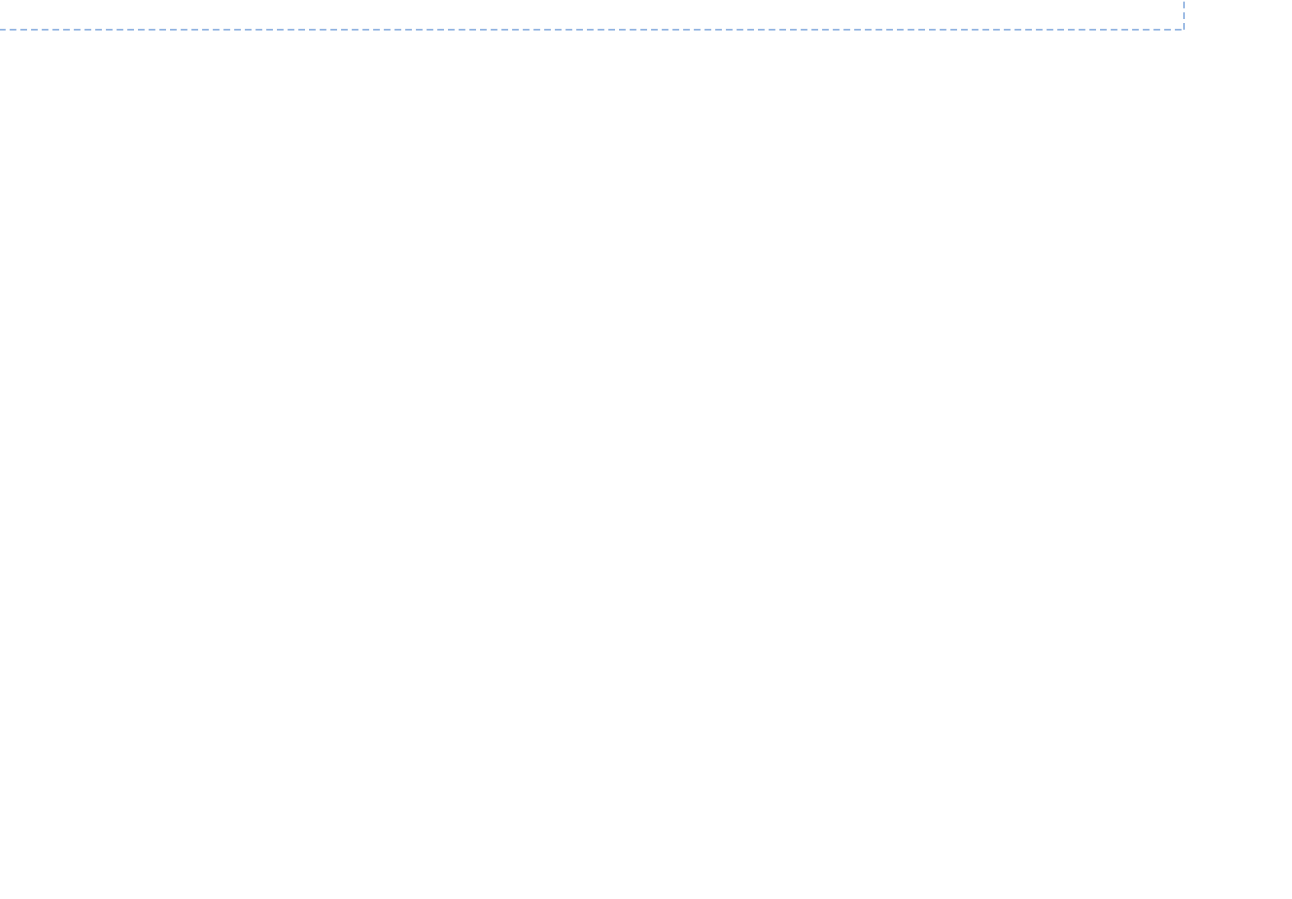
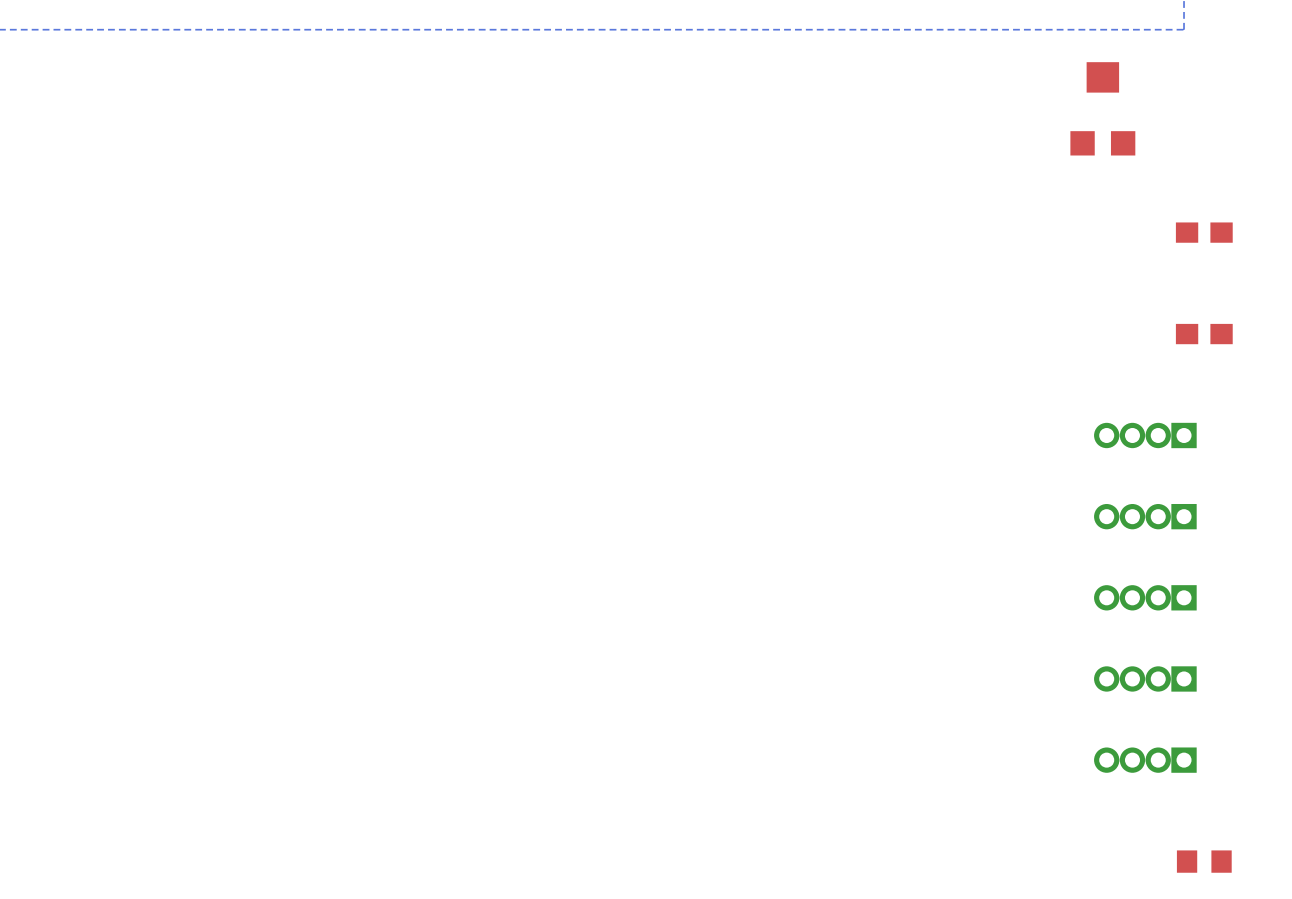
part: none -> (1102, 108)
part: none -> (1204, 232)
part: none -> (1204, 334)
part: none -> (1145, 435)
part: none -> (1145, 516)
part: none -> (1145, 597)
part: none -> (1145, 678)
part: none -> (1145, 760)
part: none -> (1204, 861)

